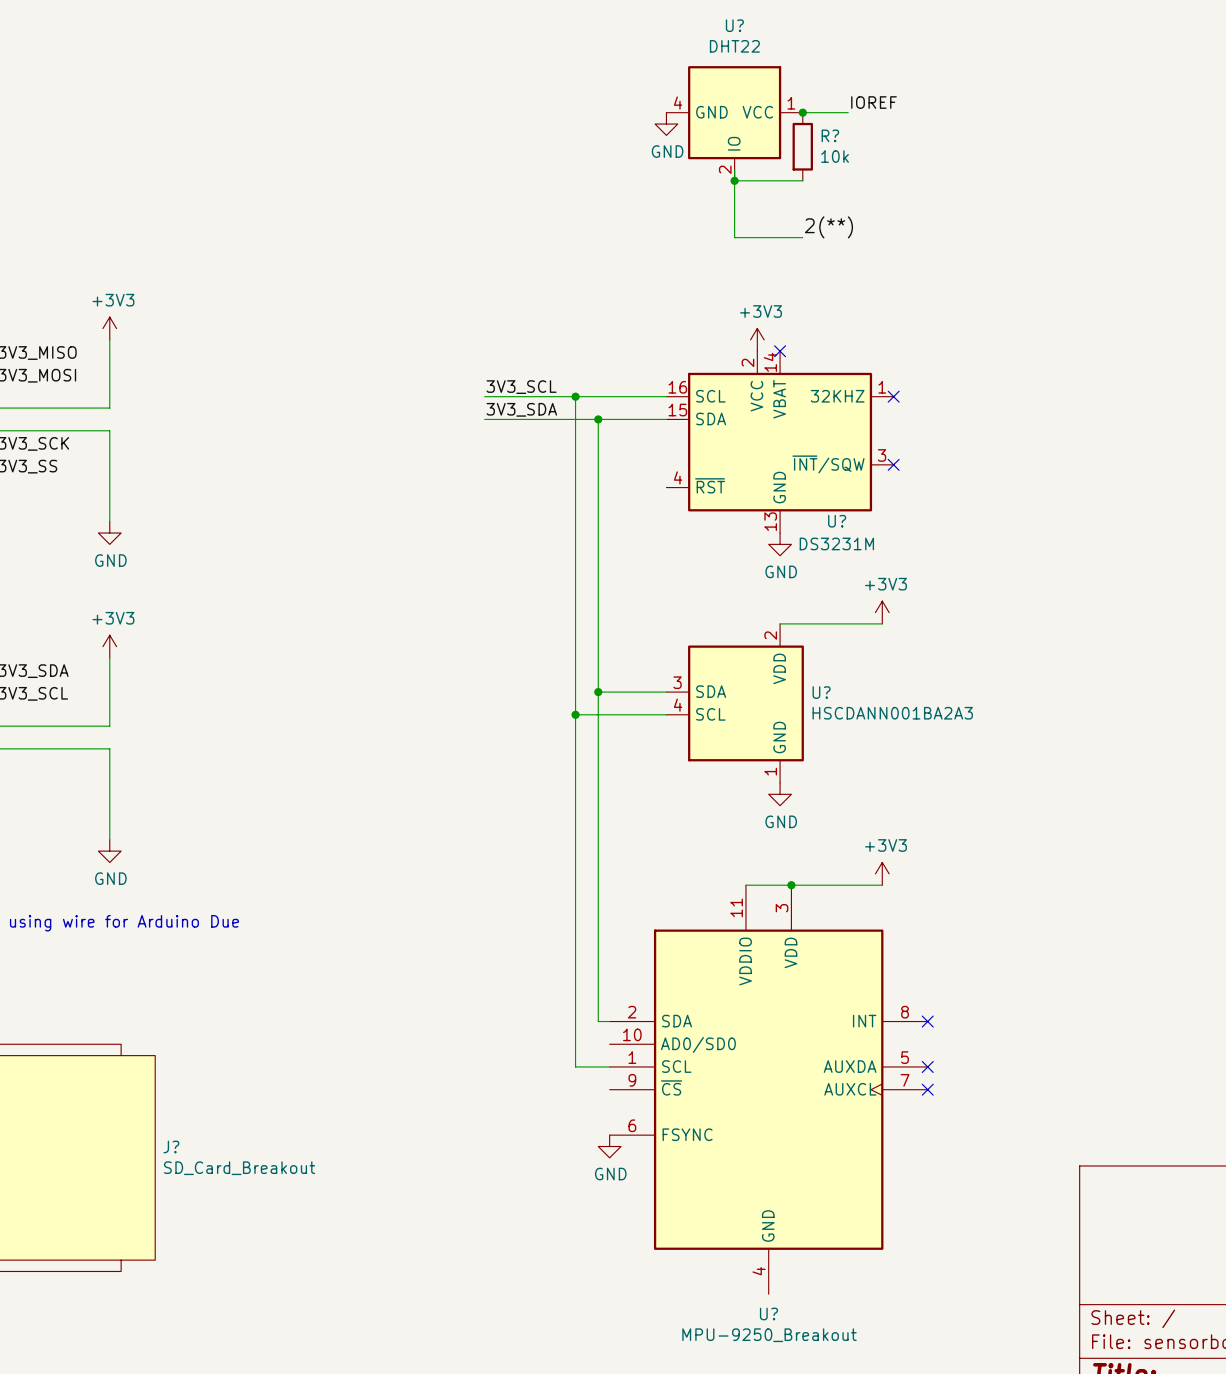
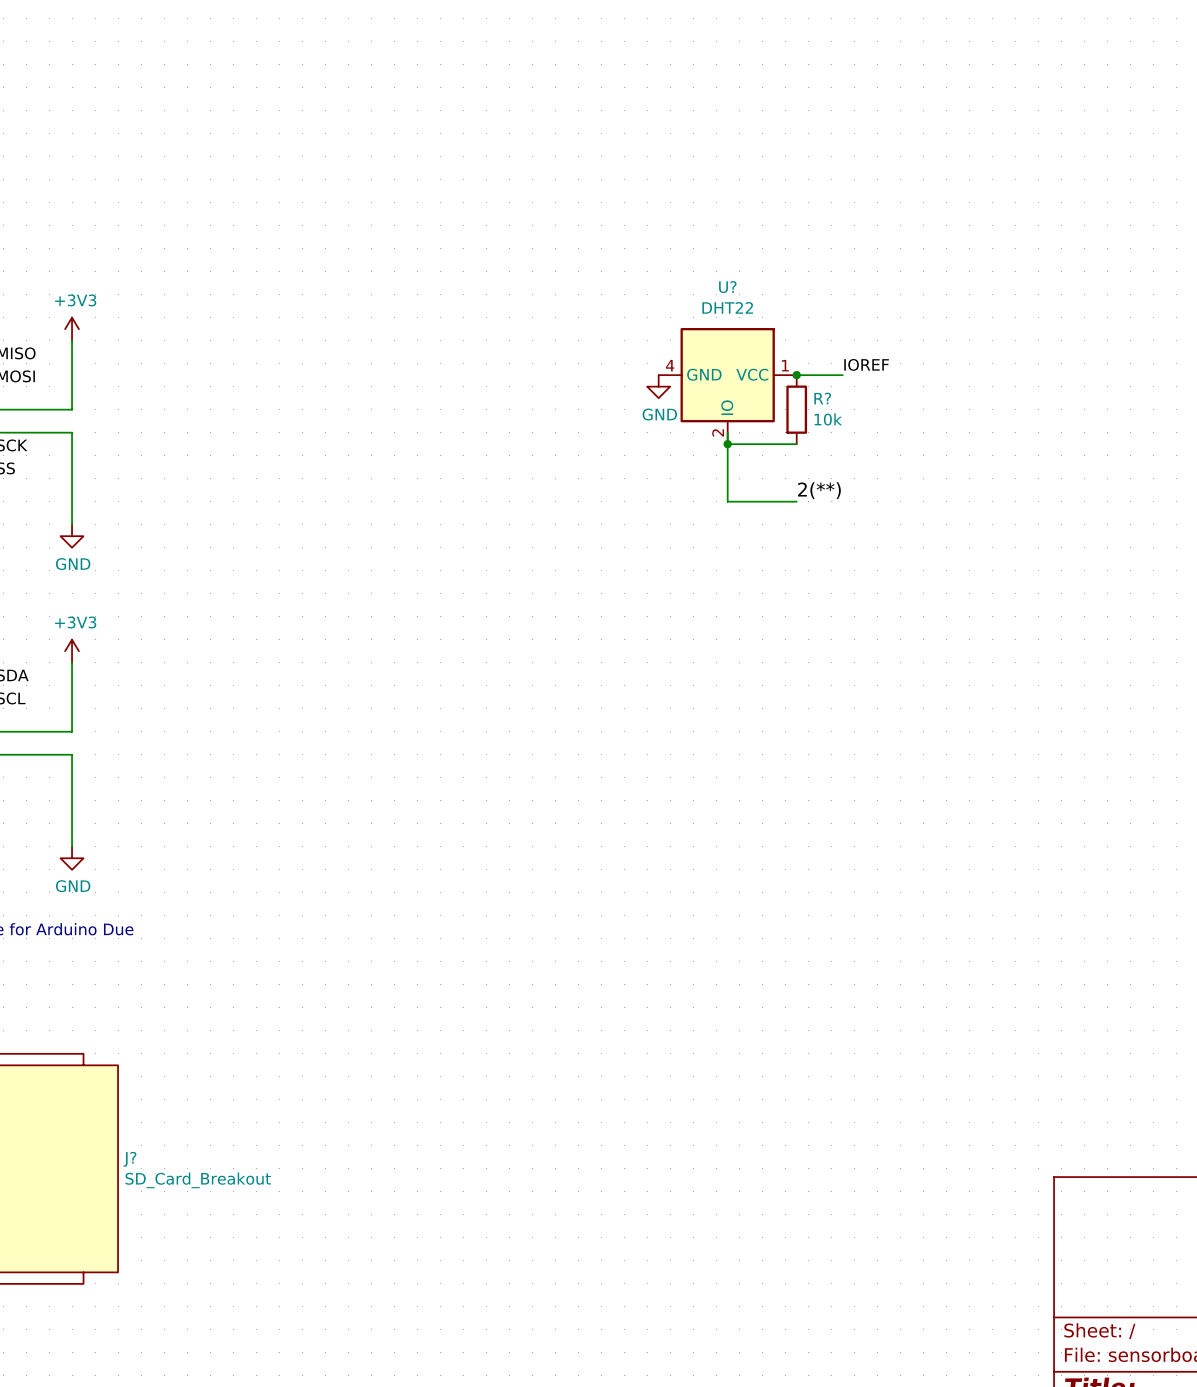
label: IOREF (874, 102) -> none
wire: (802, 112) (848, 112) -> none
junction: (802, 112) -> none
U?: DHT22 (734, 123) -> none
power symbol: GND (666, 124) -> none
R?: 10k (802, 146) -> none
wire: (734, 169) (734, 237) (802, 237) -> none
wire: (734, 180) (802, 180) -> none
junction: (734, 180) -> none
label: 2(**) (828, 227) -> none
power symbol: +3V3 (757, 339) -> none
no-connect mark: (780, 351) -> none
label: none -> IOREF (866, 364)
junction: none -> (796, 375)
U?: none -> DHT22 (727, 386)
power symbol: none -> GND (658, 386)
label: 3V3_SCL (521, 387) -> none
wire: (484, 396) (666, 396) -> none
wire: (575, 396) (575, 1066) (609, 1066) -> none
junction: (575, 396) -> none
no-connect mark: (893, 396) -> none
R?: none -> 10k (796, 409)
label: 3V3_SDA (521, 409) -> none
wire: (484, 419) (666, 419) -> none
wire: (598, 419) (598, 1021) (609, 1021) -> none
junction: (598, 419) -> none
junction: none -> (727, 444)
U?: DS3231M (780, 442) -> none
no-connect mark: (893, 464) -> none
label: none -> 2(**) (819, 490)
power symbol: GND (780, 544) -> none
power symbol: +3V3 (882, 612) -> none
wire: (780, 623) (882, 623) -> none
wire: (598, 692) (666, 692) -> none
junction: (598, 692) -> none
U?: HSCDANN001BA2A3 (735, 703) -> none
wire: (575, 714) (666, 714) -> none
junction: (575, 714) -> none
power symbol: GND (780, 794) -> none
power symbol: +3V3 (882, 873) -> none
wire: (745, 885) (882, 885) -> none
junction: (791, 885) -> none
no-connect mark: (927, 1021) -> none
no-connect mark: (927, 1066) -> none
U?: MPU-9250_Breakout (768, 1089) -> none
no-connect mark: (927, 1089) -> none
power symbol: GND (609, 1146) -> none

